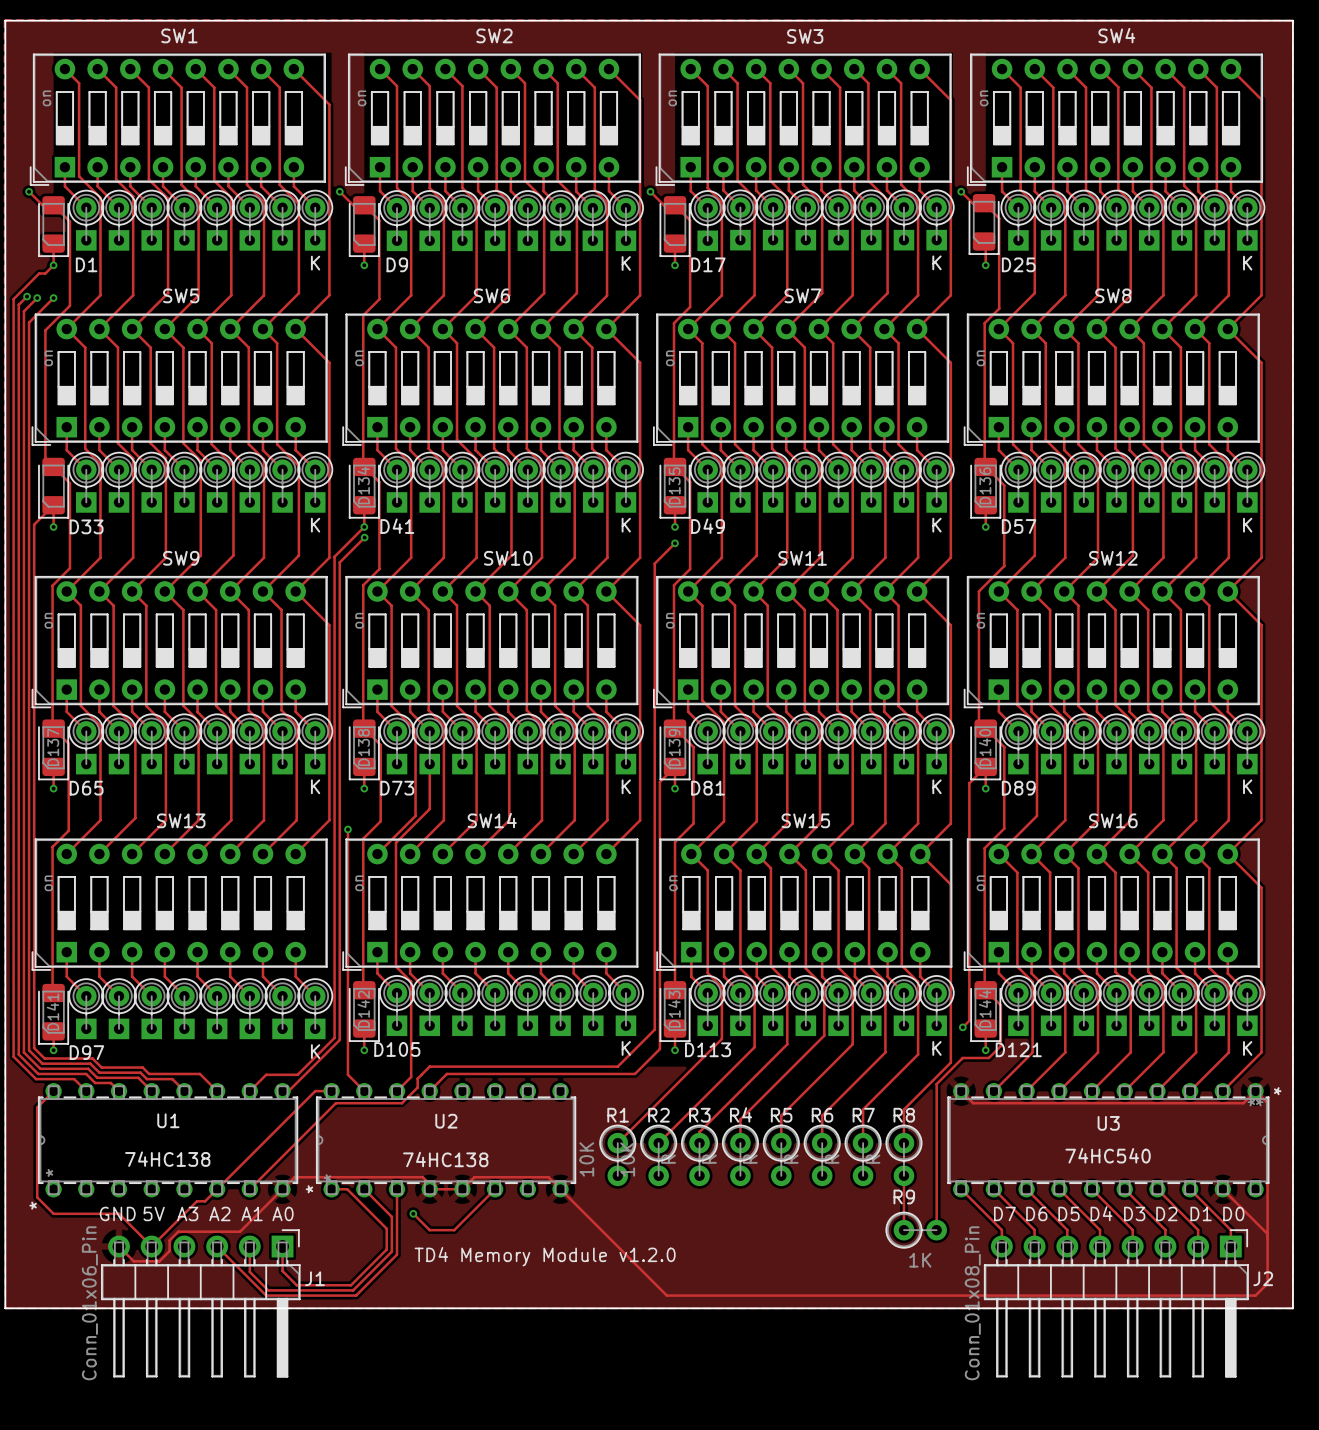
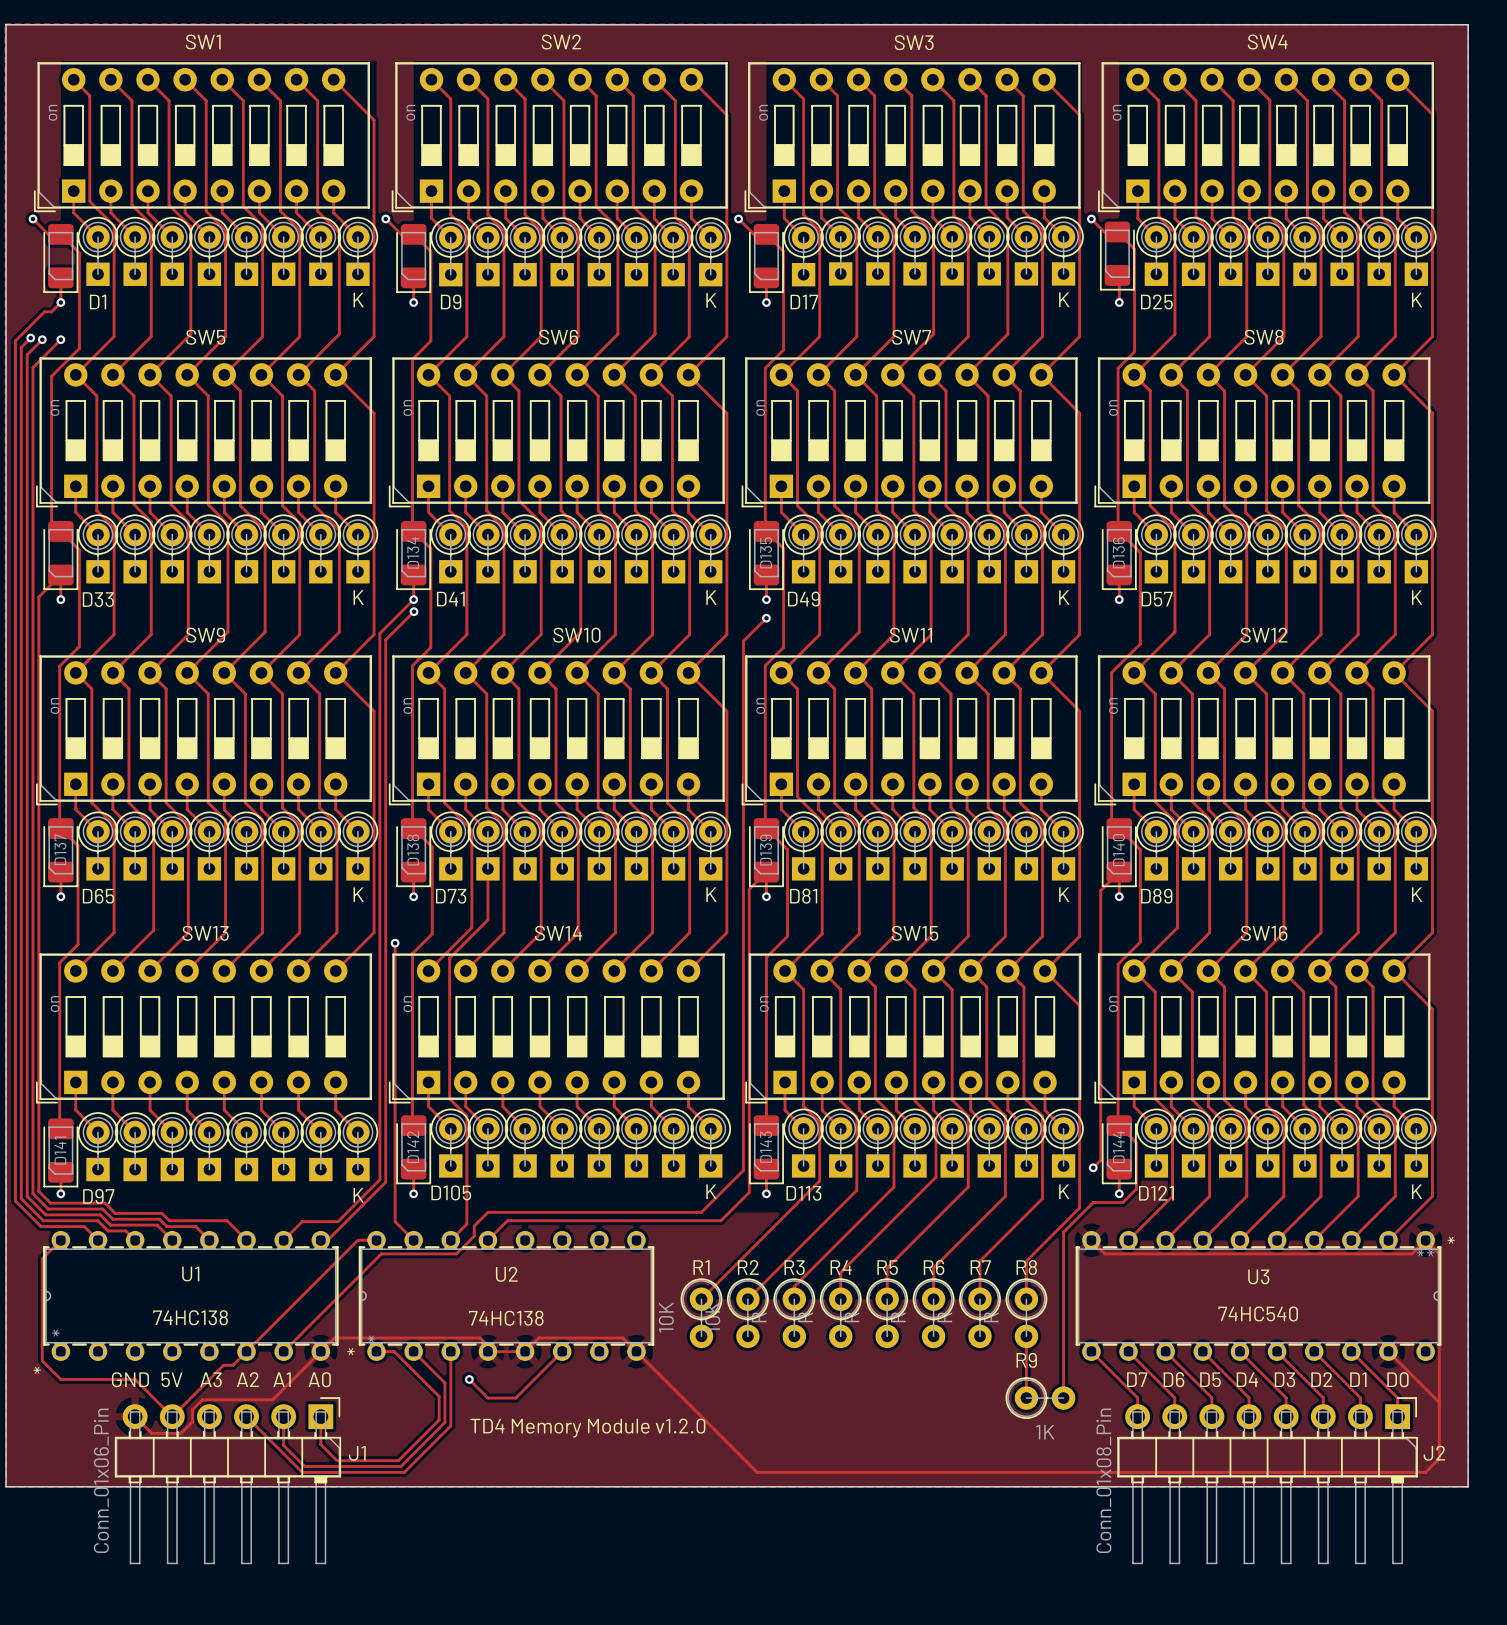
J1 footprint: [101, 1229, 301, 1378] -> [114, 1397, 342, 1565]
J2 footprint: [983, 1229, 1249, 1378] -> [1117, 1397, 1418, 1565]

